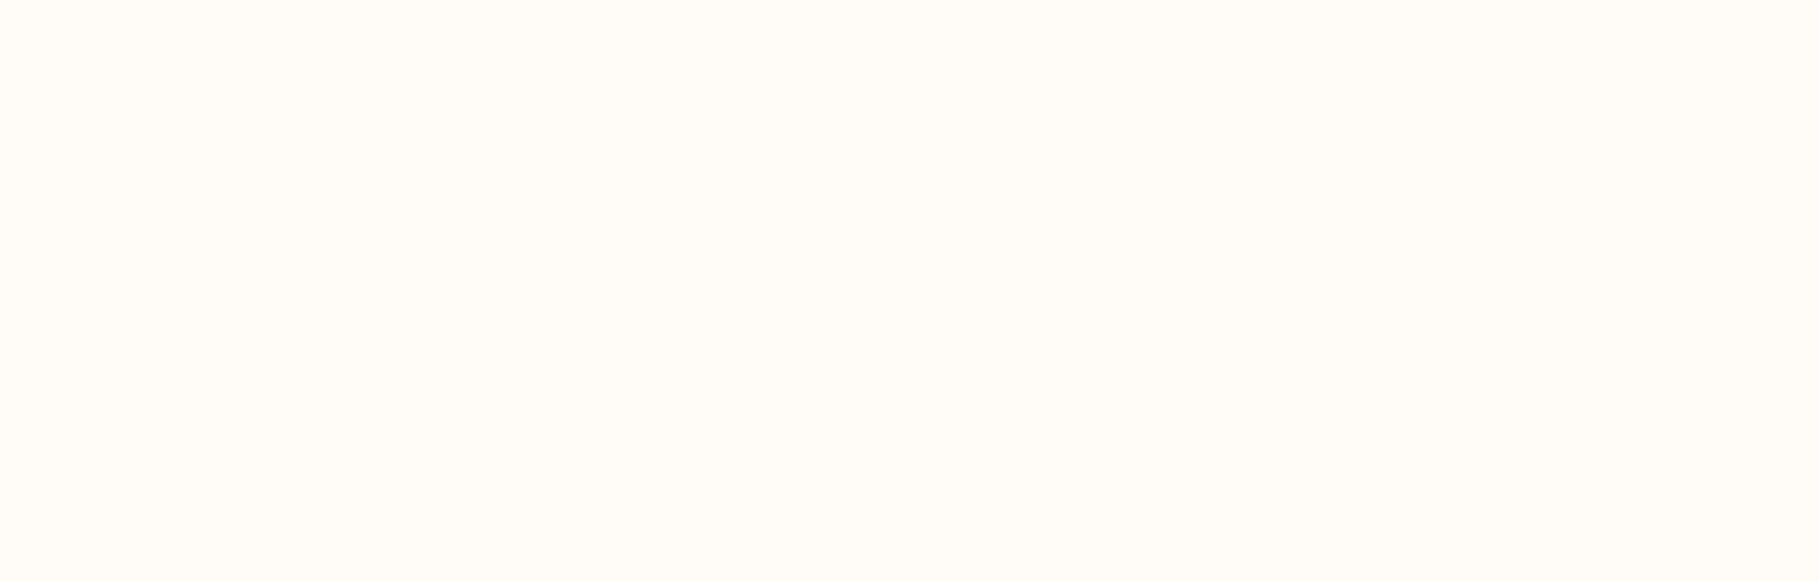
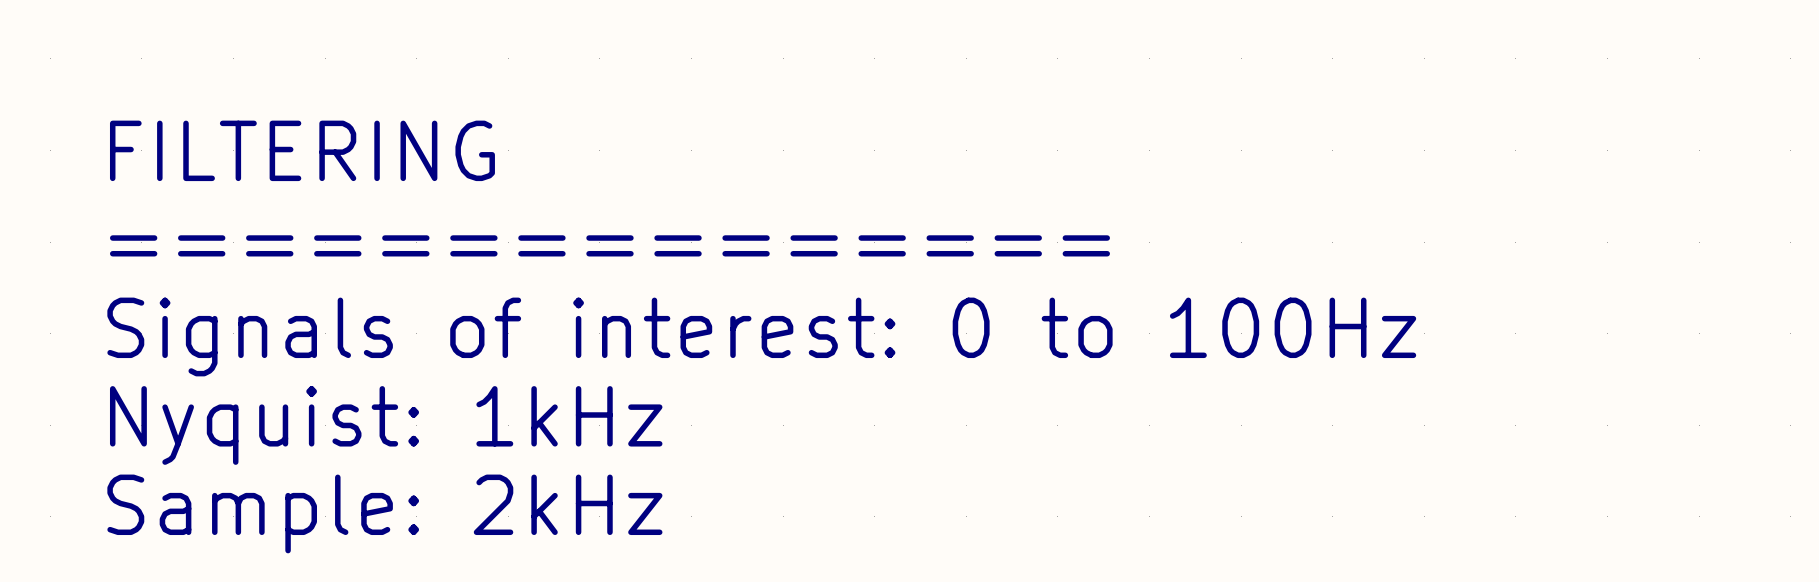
text: none -> FILTERING (302, 150)
text: none -> =============== (609, 245)
text: none -> Signals of interest: 0 to 100Hz (761, 336)
text: none -> Nyquist: 1kHz (386, 425)
text: none -> Sample: 2kHz (384, 513)

